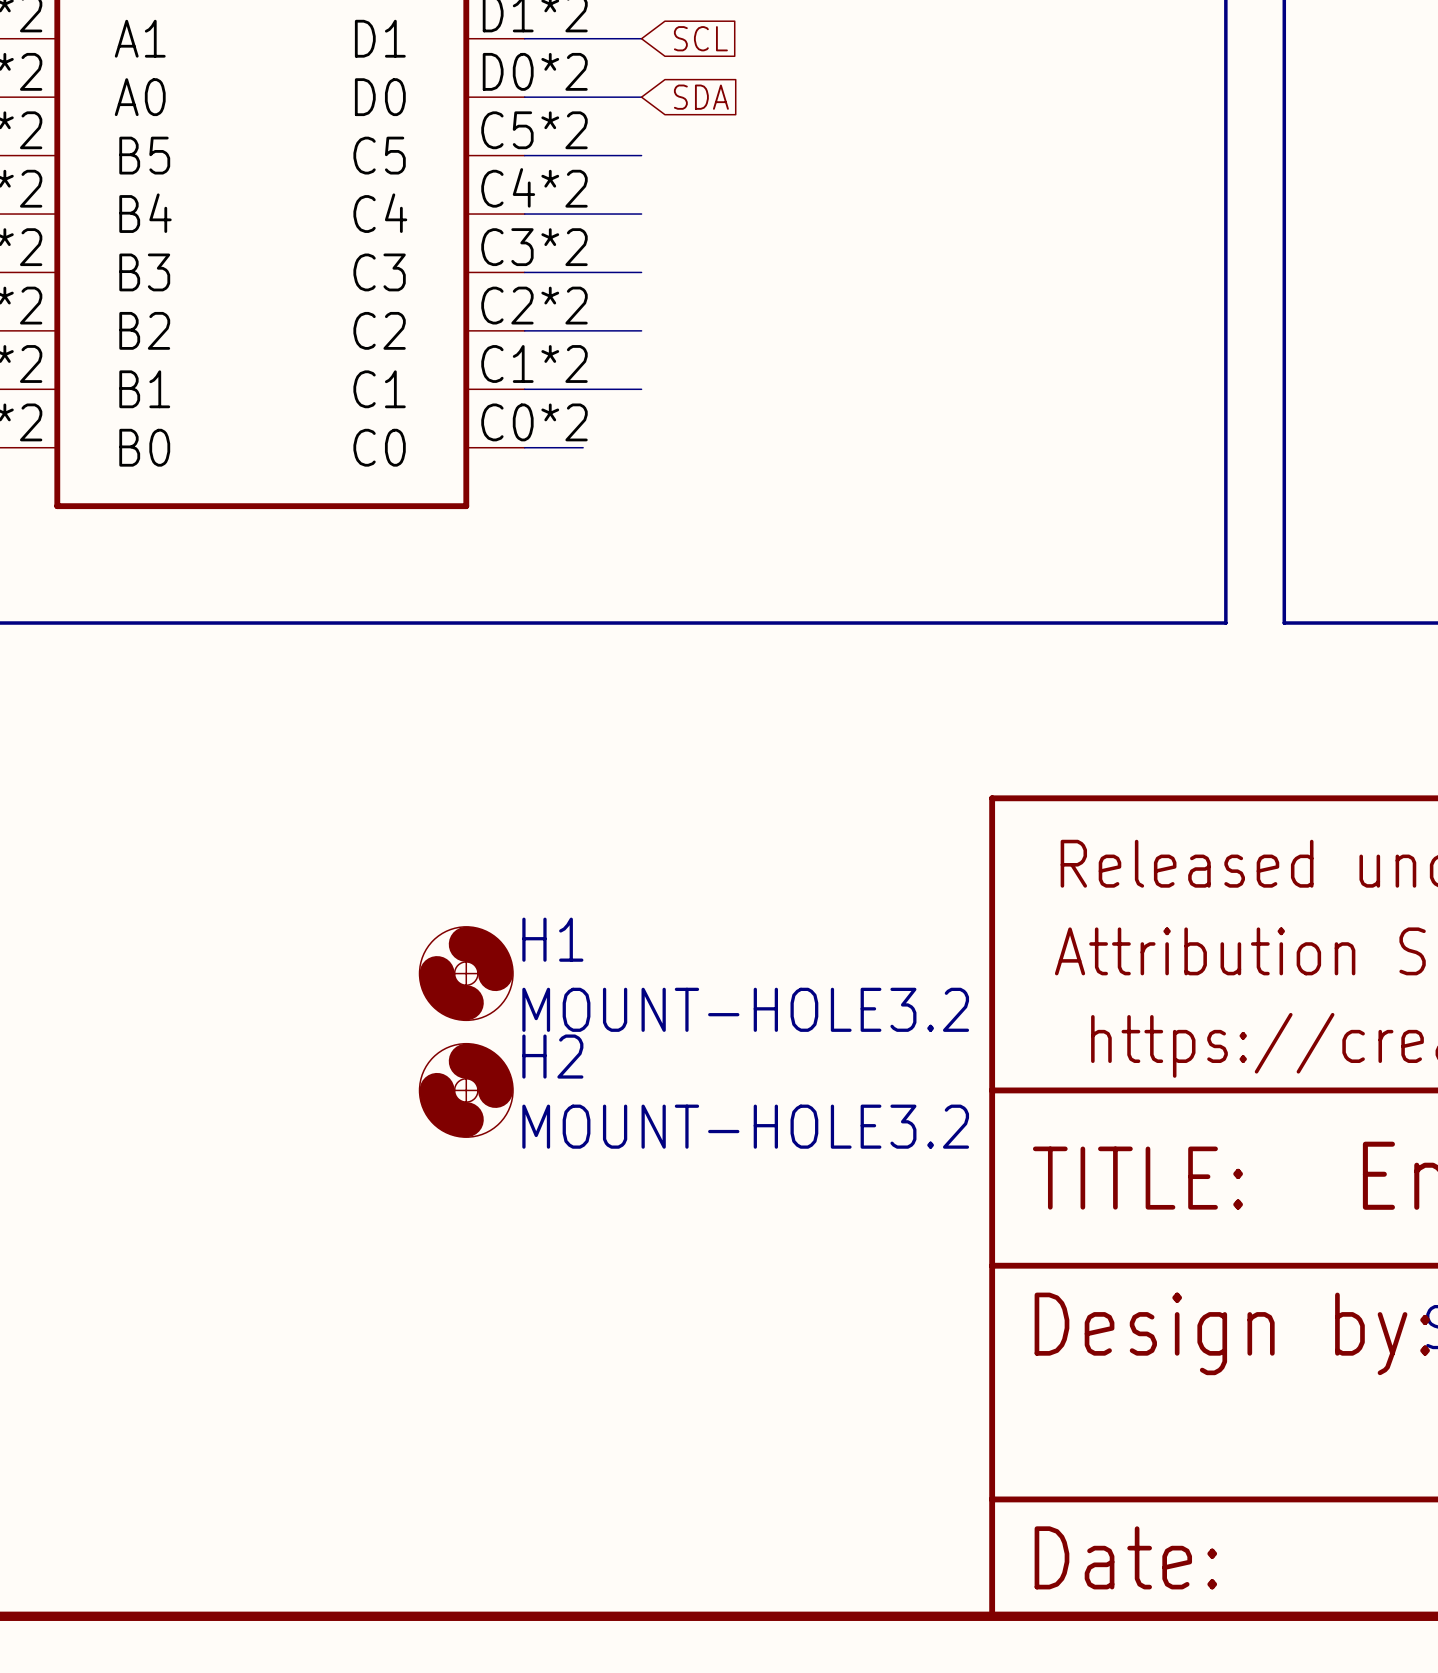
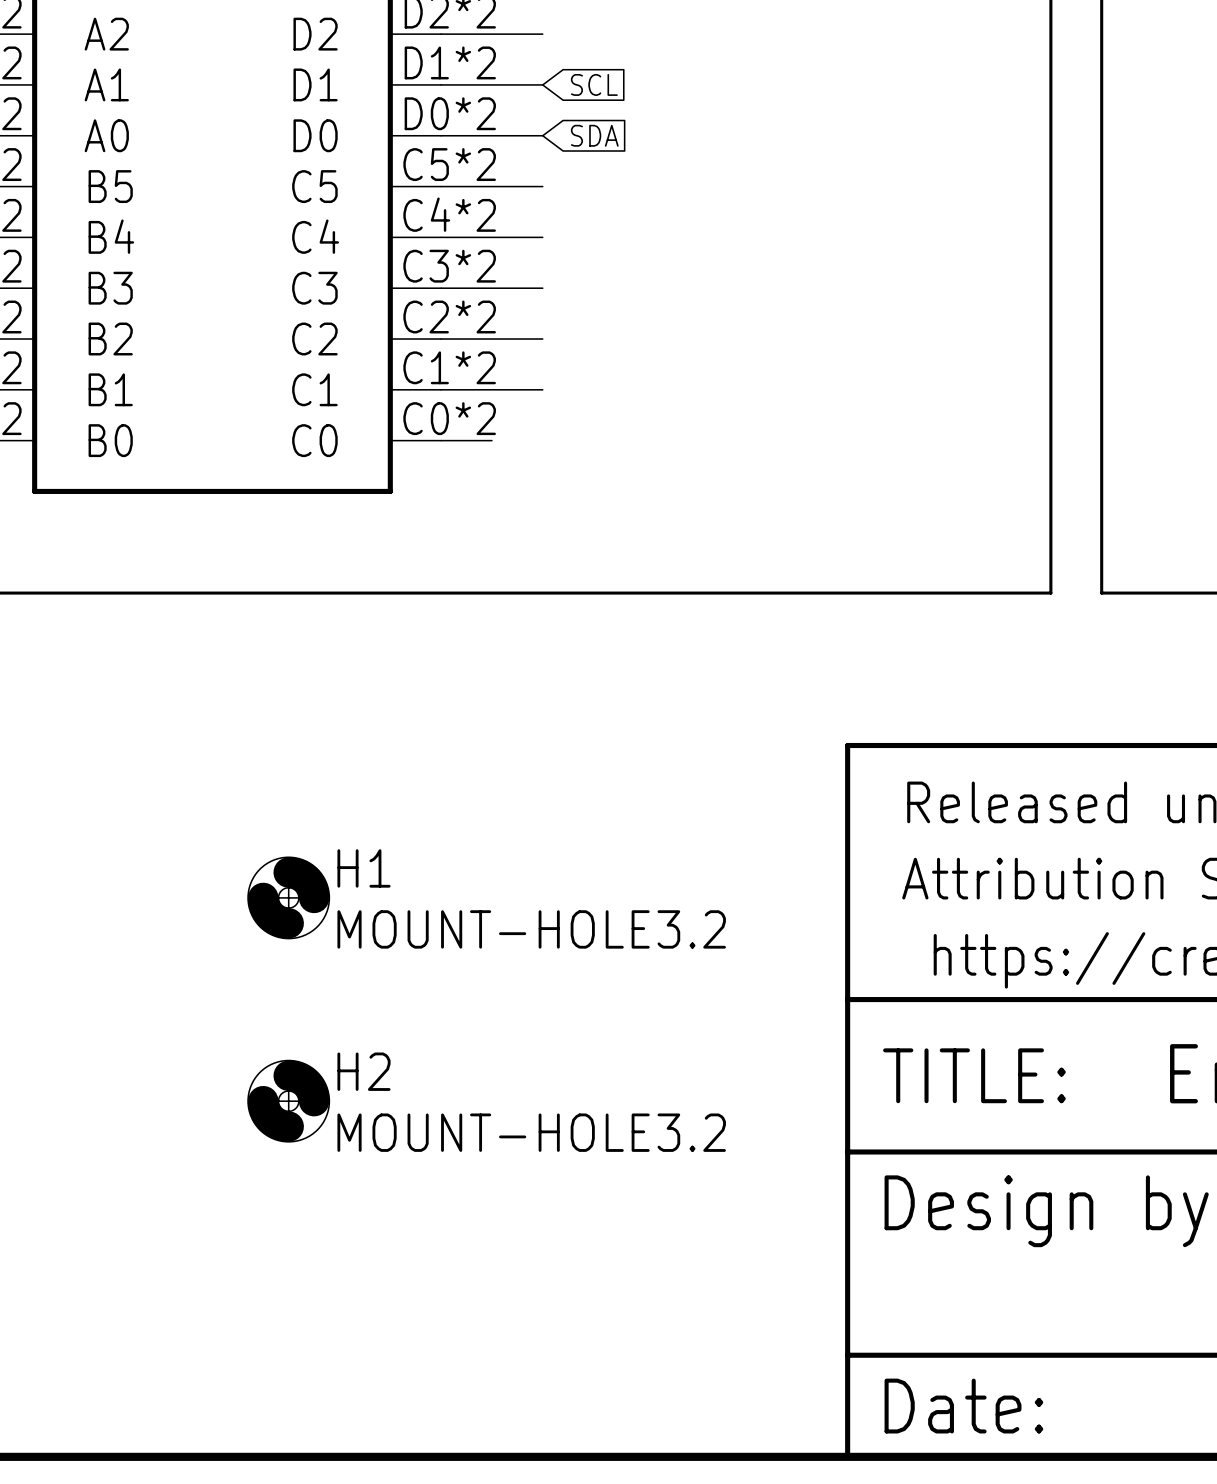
H1 position: (466, 973) -> (288, 897)
H2 position: (466, 1090) -> (288, 1101)

